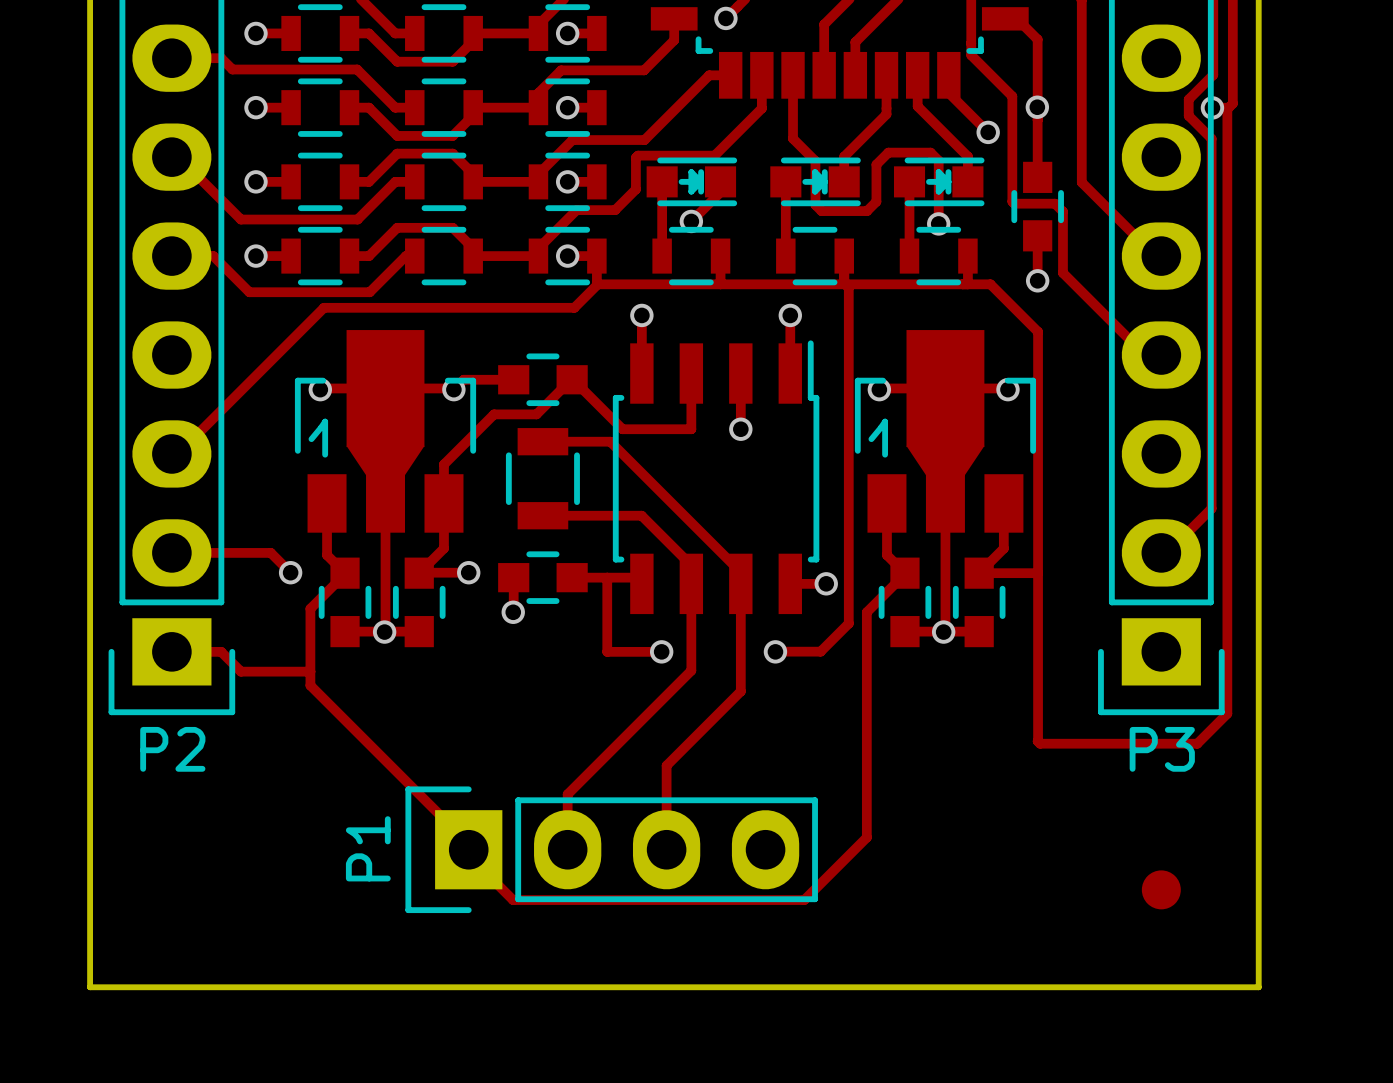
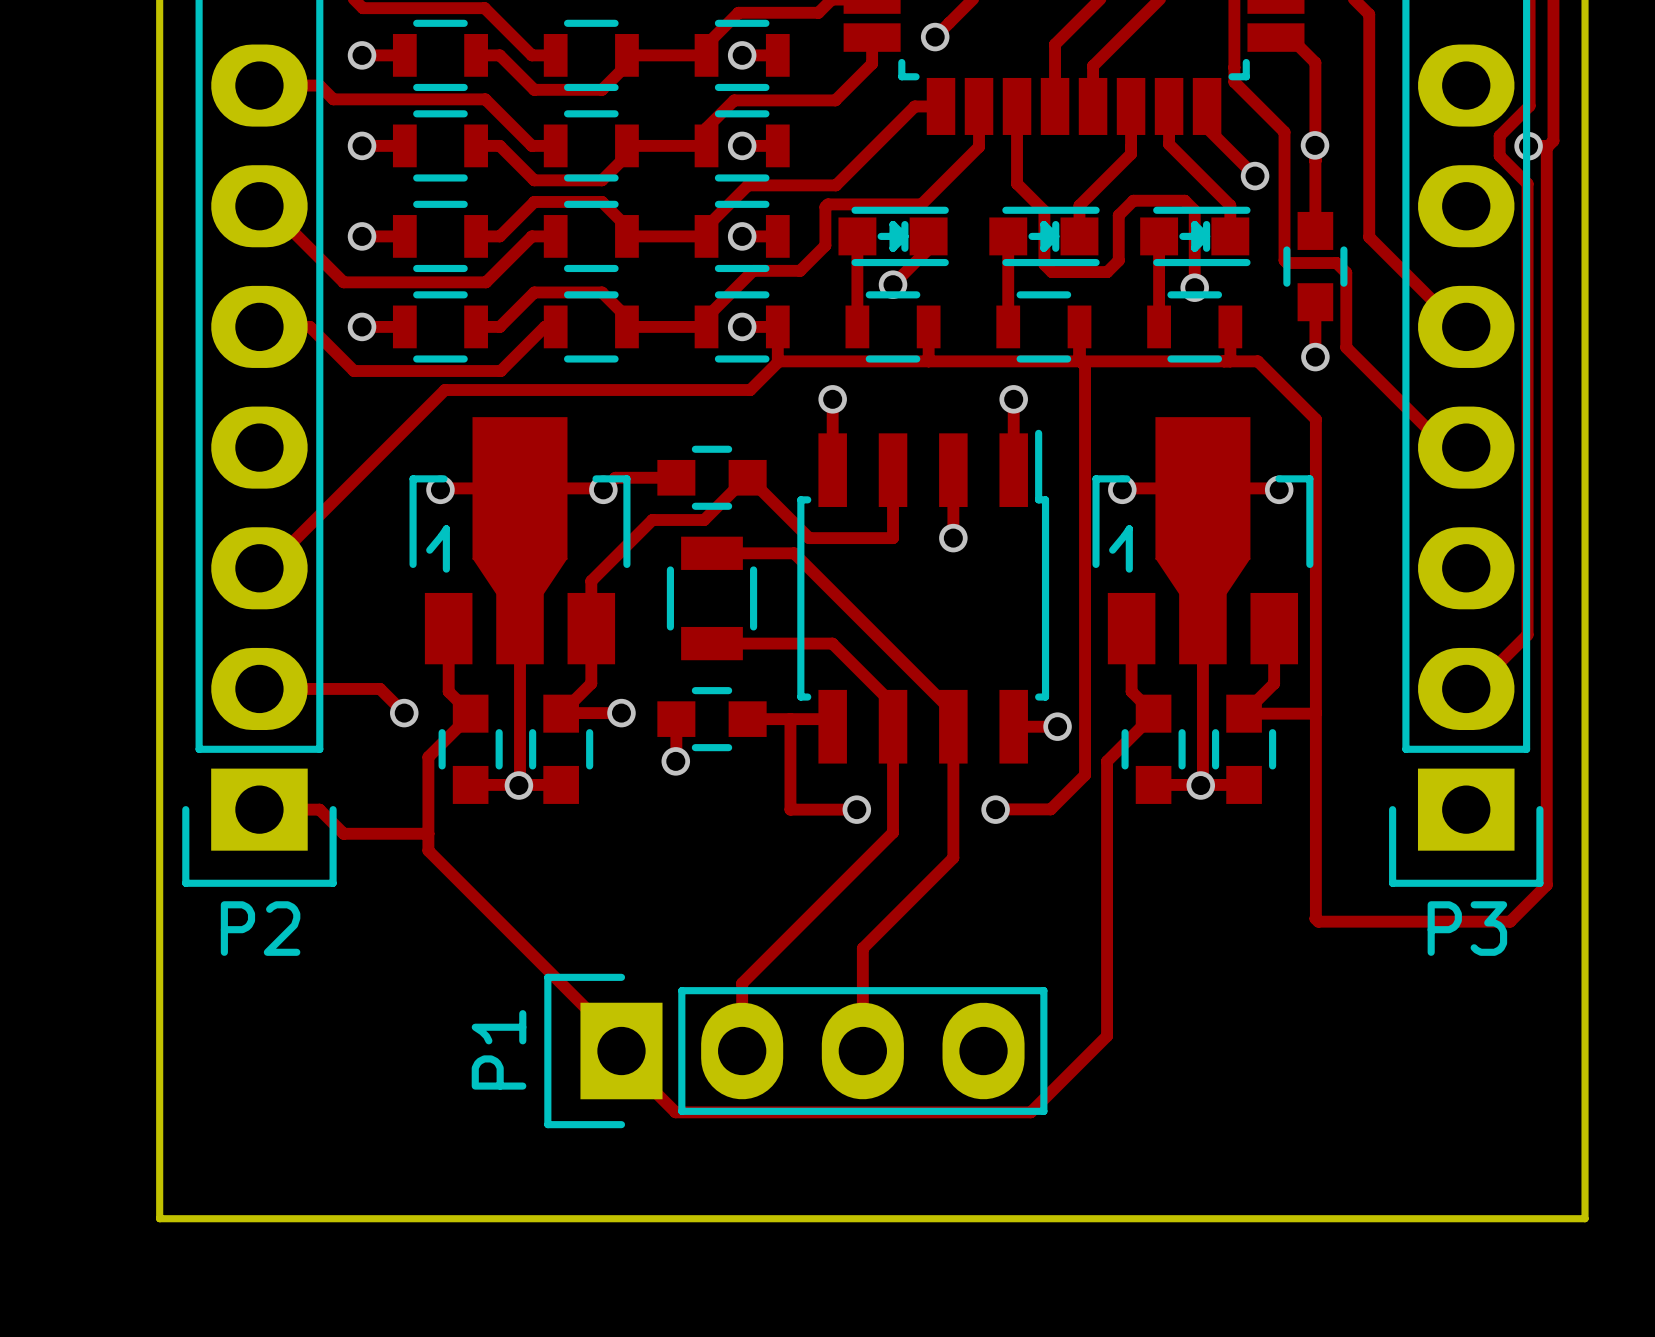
part: (1161, 889) -> none

